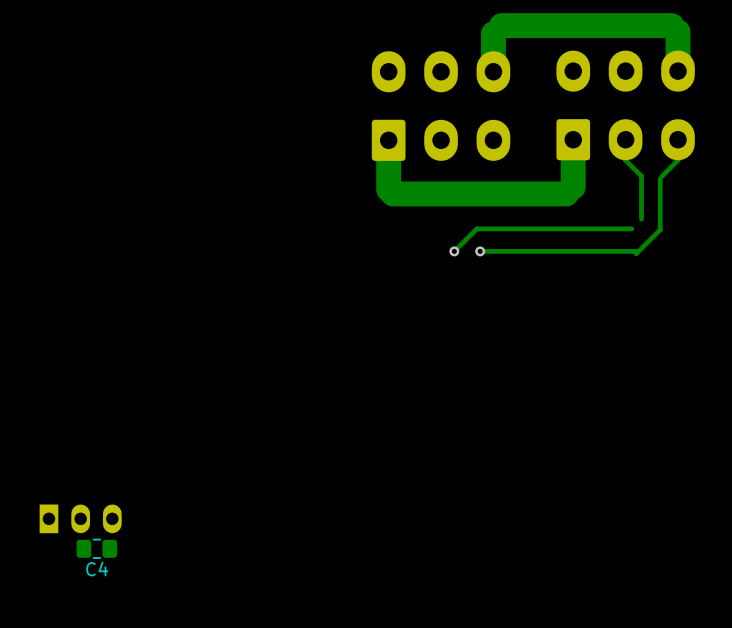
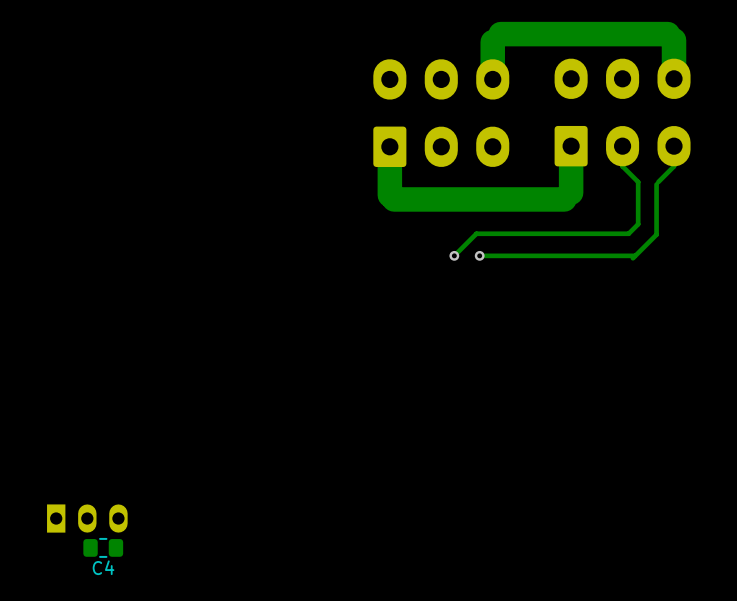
track: none -> (638, 224) (628, 233)

